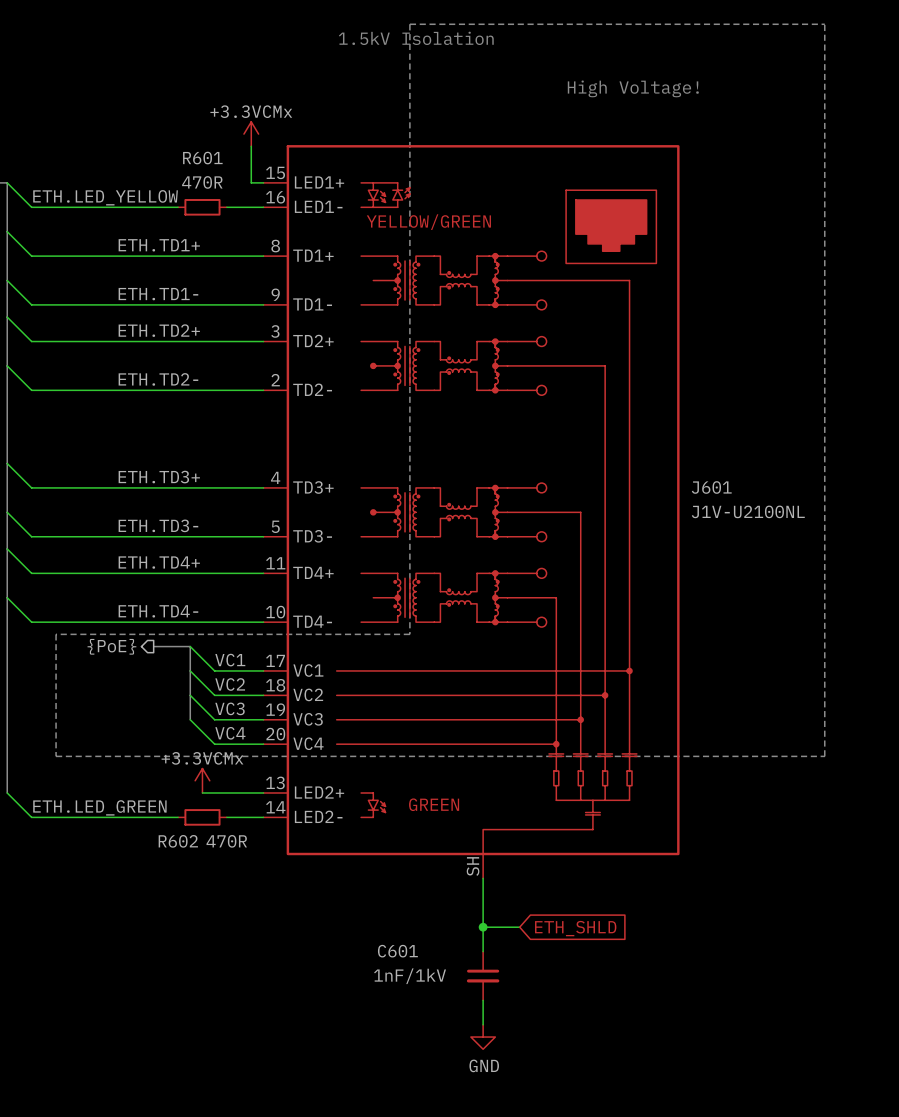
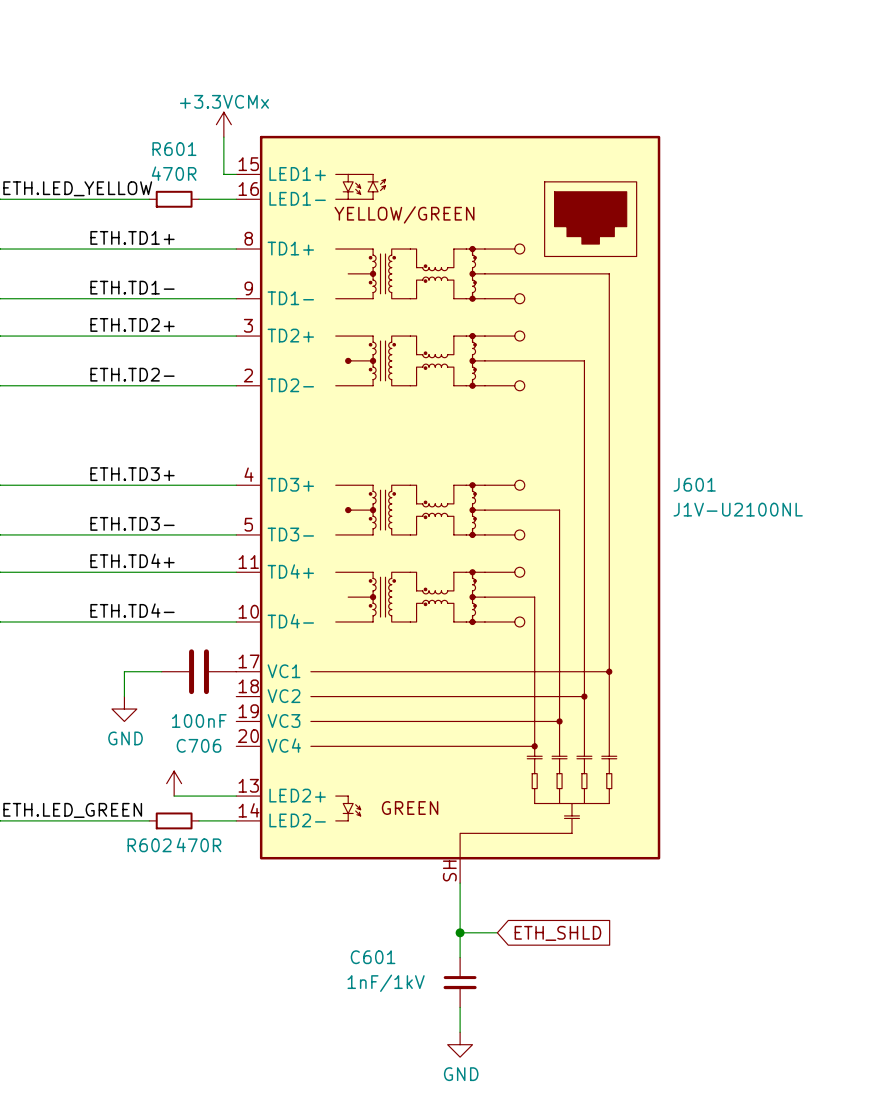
line: (409, 24) (409, 634) (56, 634) (56, 756) (824, 756) (824, 24) (409, 24) -> none
text: 1.5kV Isolation (416, 38) -> none
text: High Voltage! (633, 88) -> none
hierarchical label: {PoE} (111, 646) -> none
bus: (153, 646) (190, 646) (190, 719) -> none
wire: (190, 646) (214, 670) (263, 670) -> none
label: VC1 (230, 660) -> none
wire: (190, 670) (214, 695) (263, 695) -> (161, 671) (124, 671) (124, 696)
C706: none -> 100nF (199, 671)
label: VC2 (230, 684) -> none
wire: (190, 695) (214, 719) (263, 719) -> none
power symbol: none -> GND (124, 709)
label: VC3 (230, 708) -> none
wire: (190, 719) (214, 744) (263, 744) -> none
label: VC4 (230, 733) -> none
power symbol text: +3.3VCMx (202, 758) -> none

